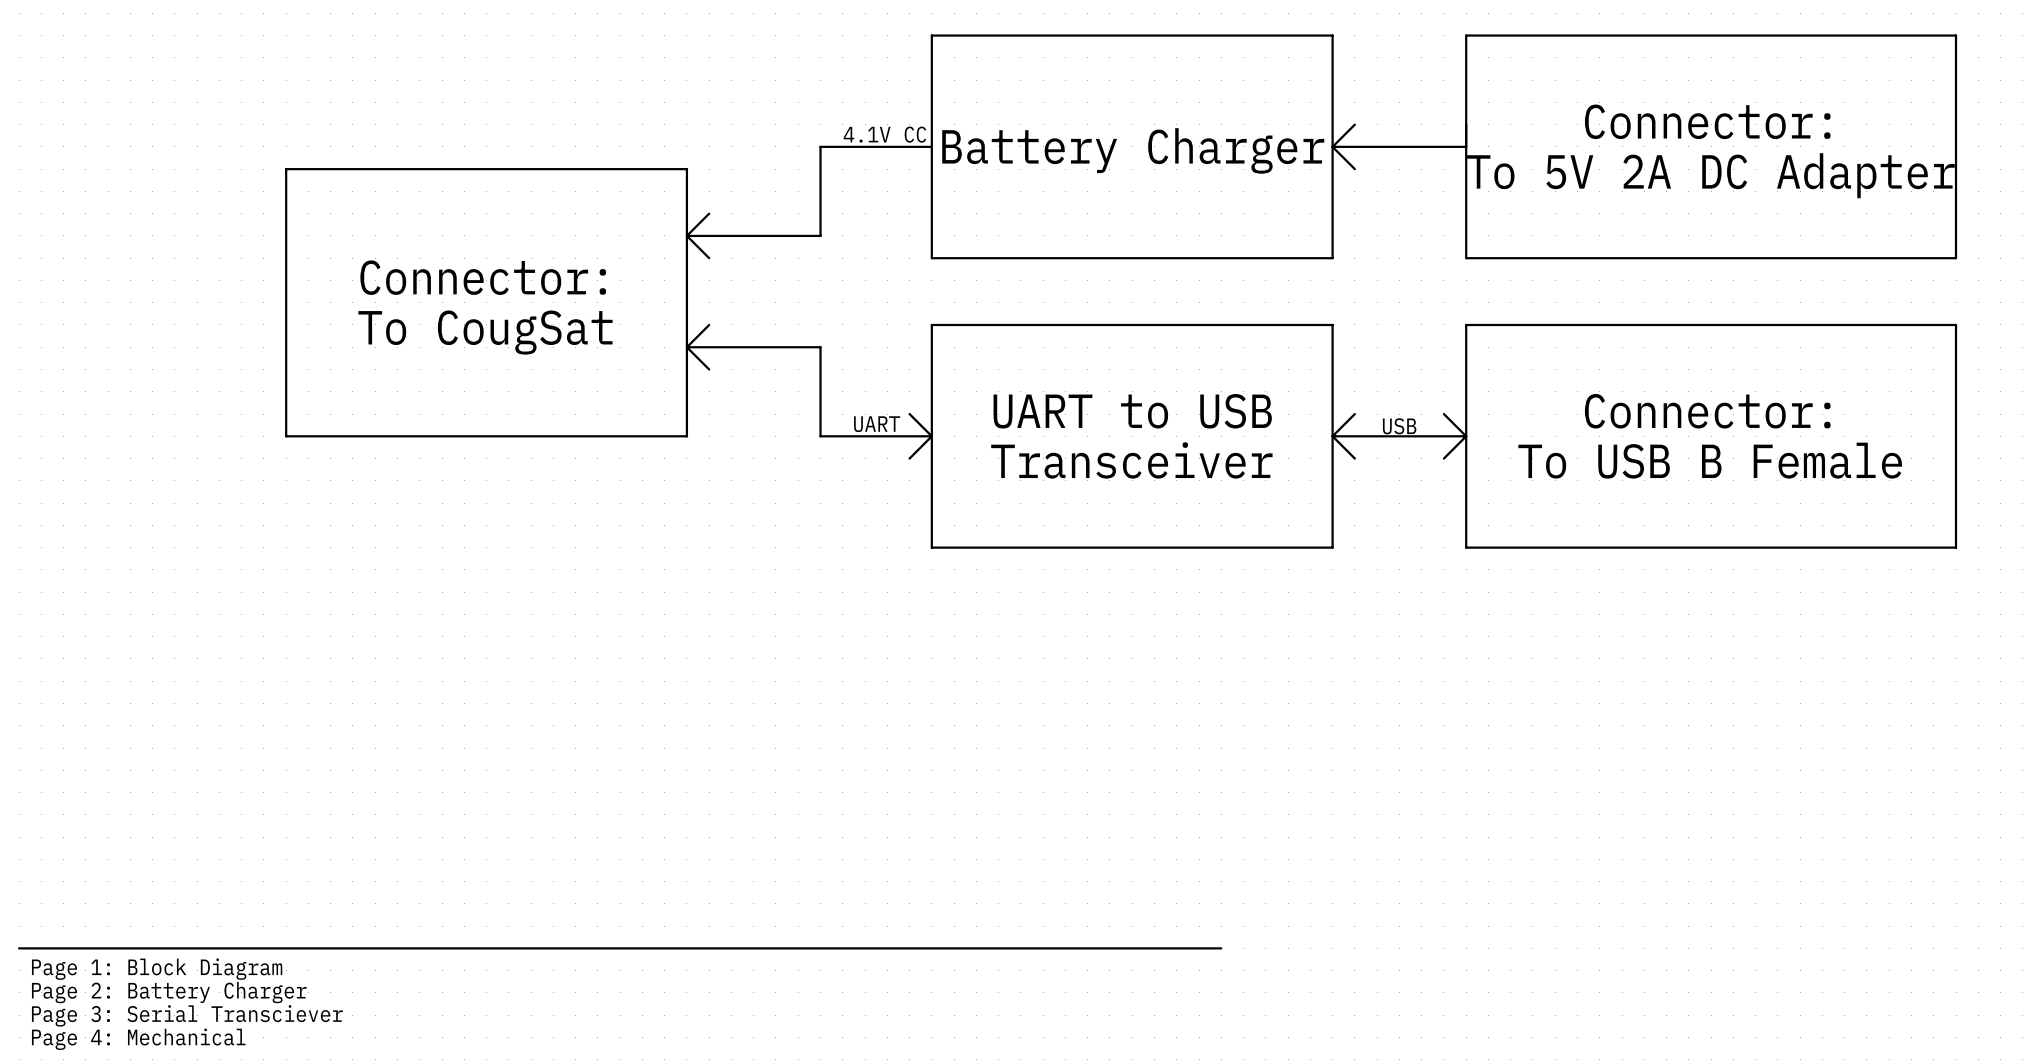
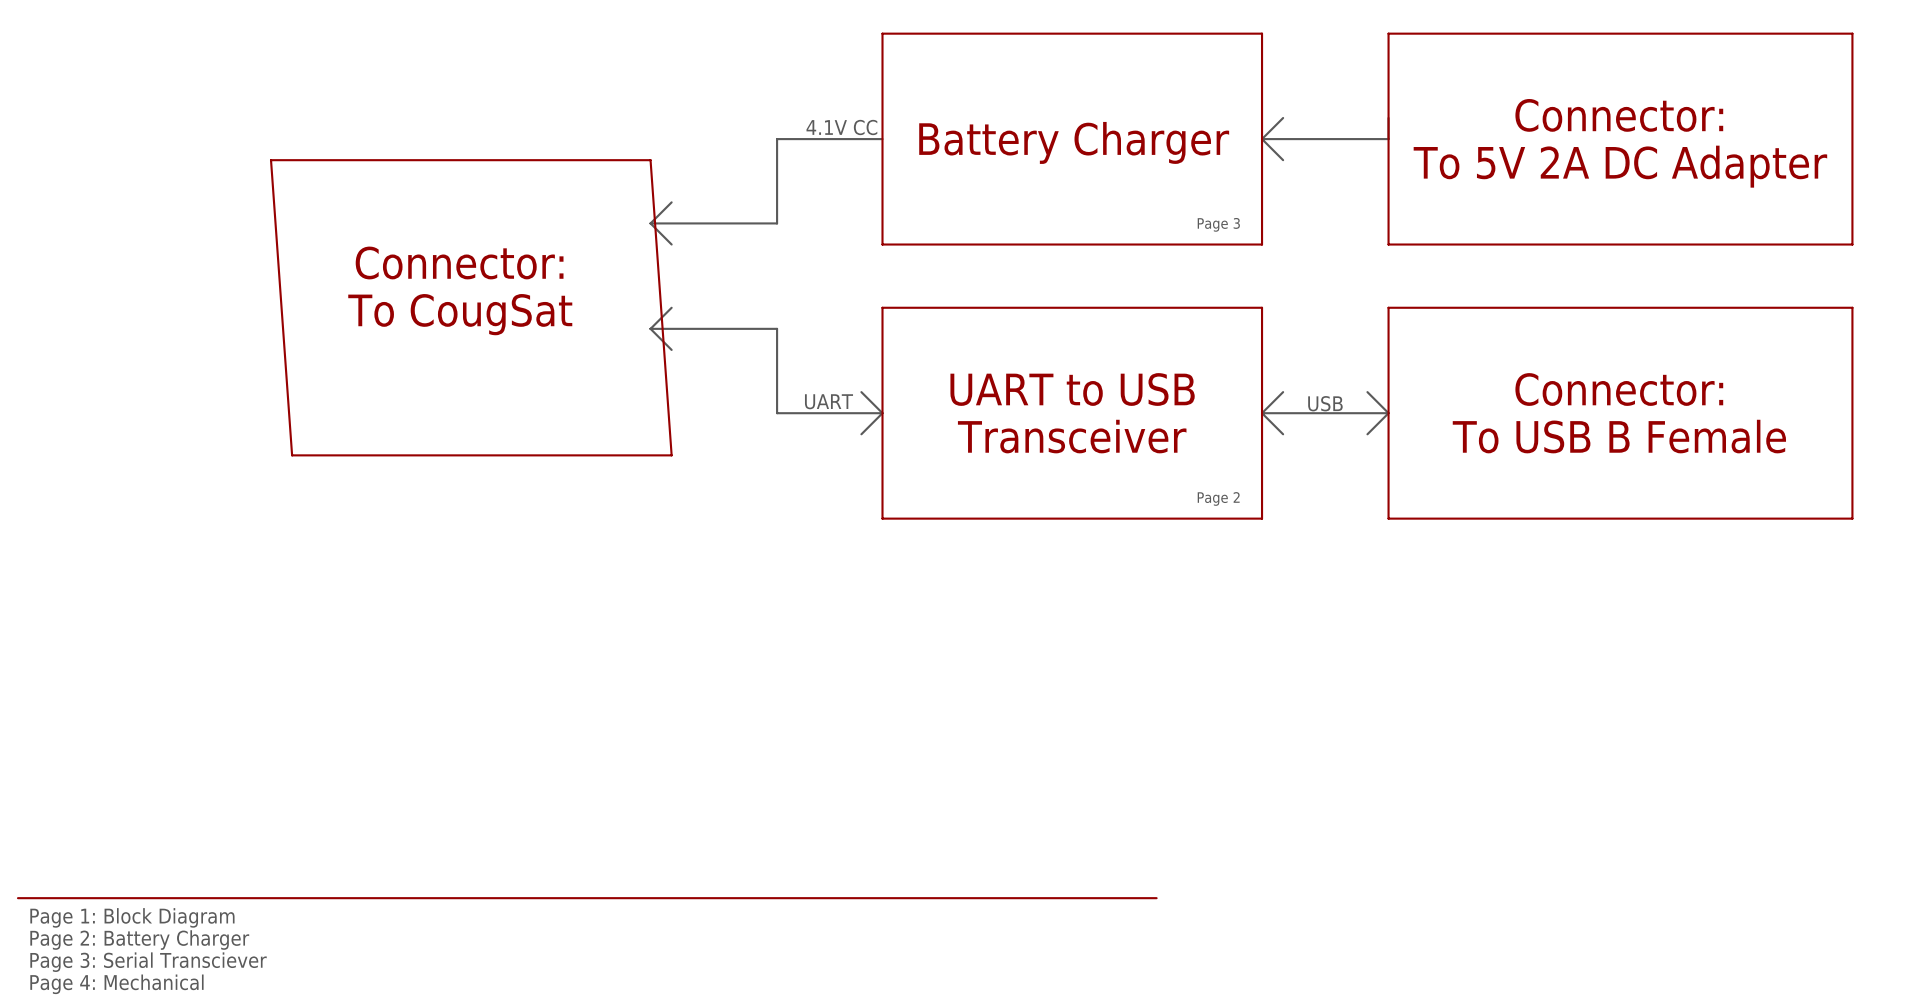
line: (286, 169) (286, 436) (686, 436) (686, 169) -> (271, 160) (292, 455) (671, 455) (650, 160)
text: none -> Page 3 (1218, 224)
text: none -> Page 2 (1218, 498)

